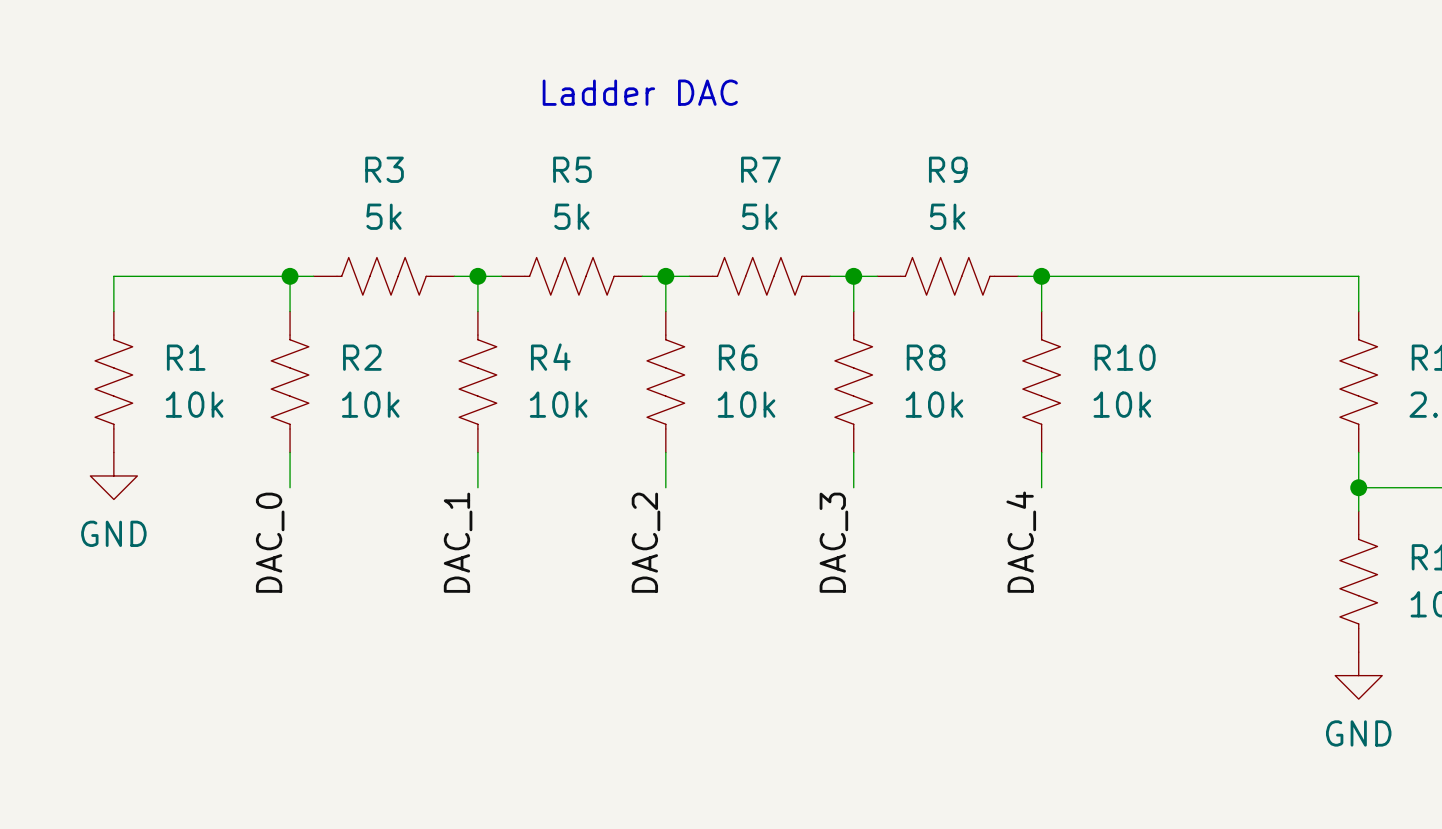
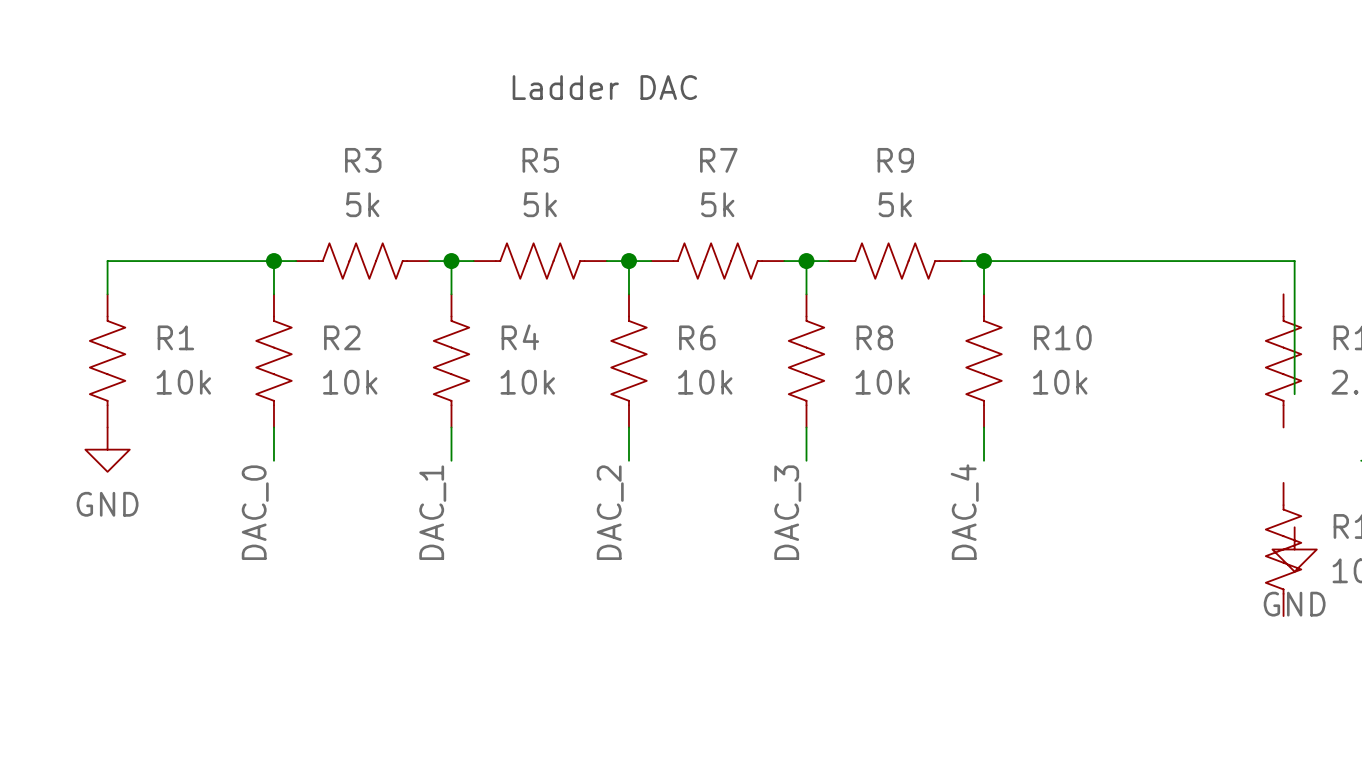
wire: (1358, 276) (1358, 311) -> (1283, 261) (1294, 261) (1294, 394)
wire: (1358, 452) (1358, 511) -> none
wire: (1358, 487) (1440, 487) -> none
junction: (1358, 487) -> none
power symbol position: GND (1358, 675) -> GND (1294, 549)

